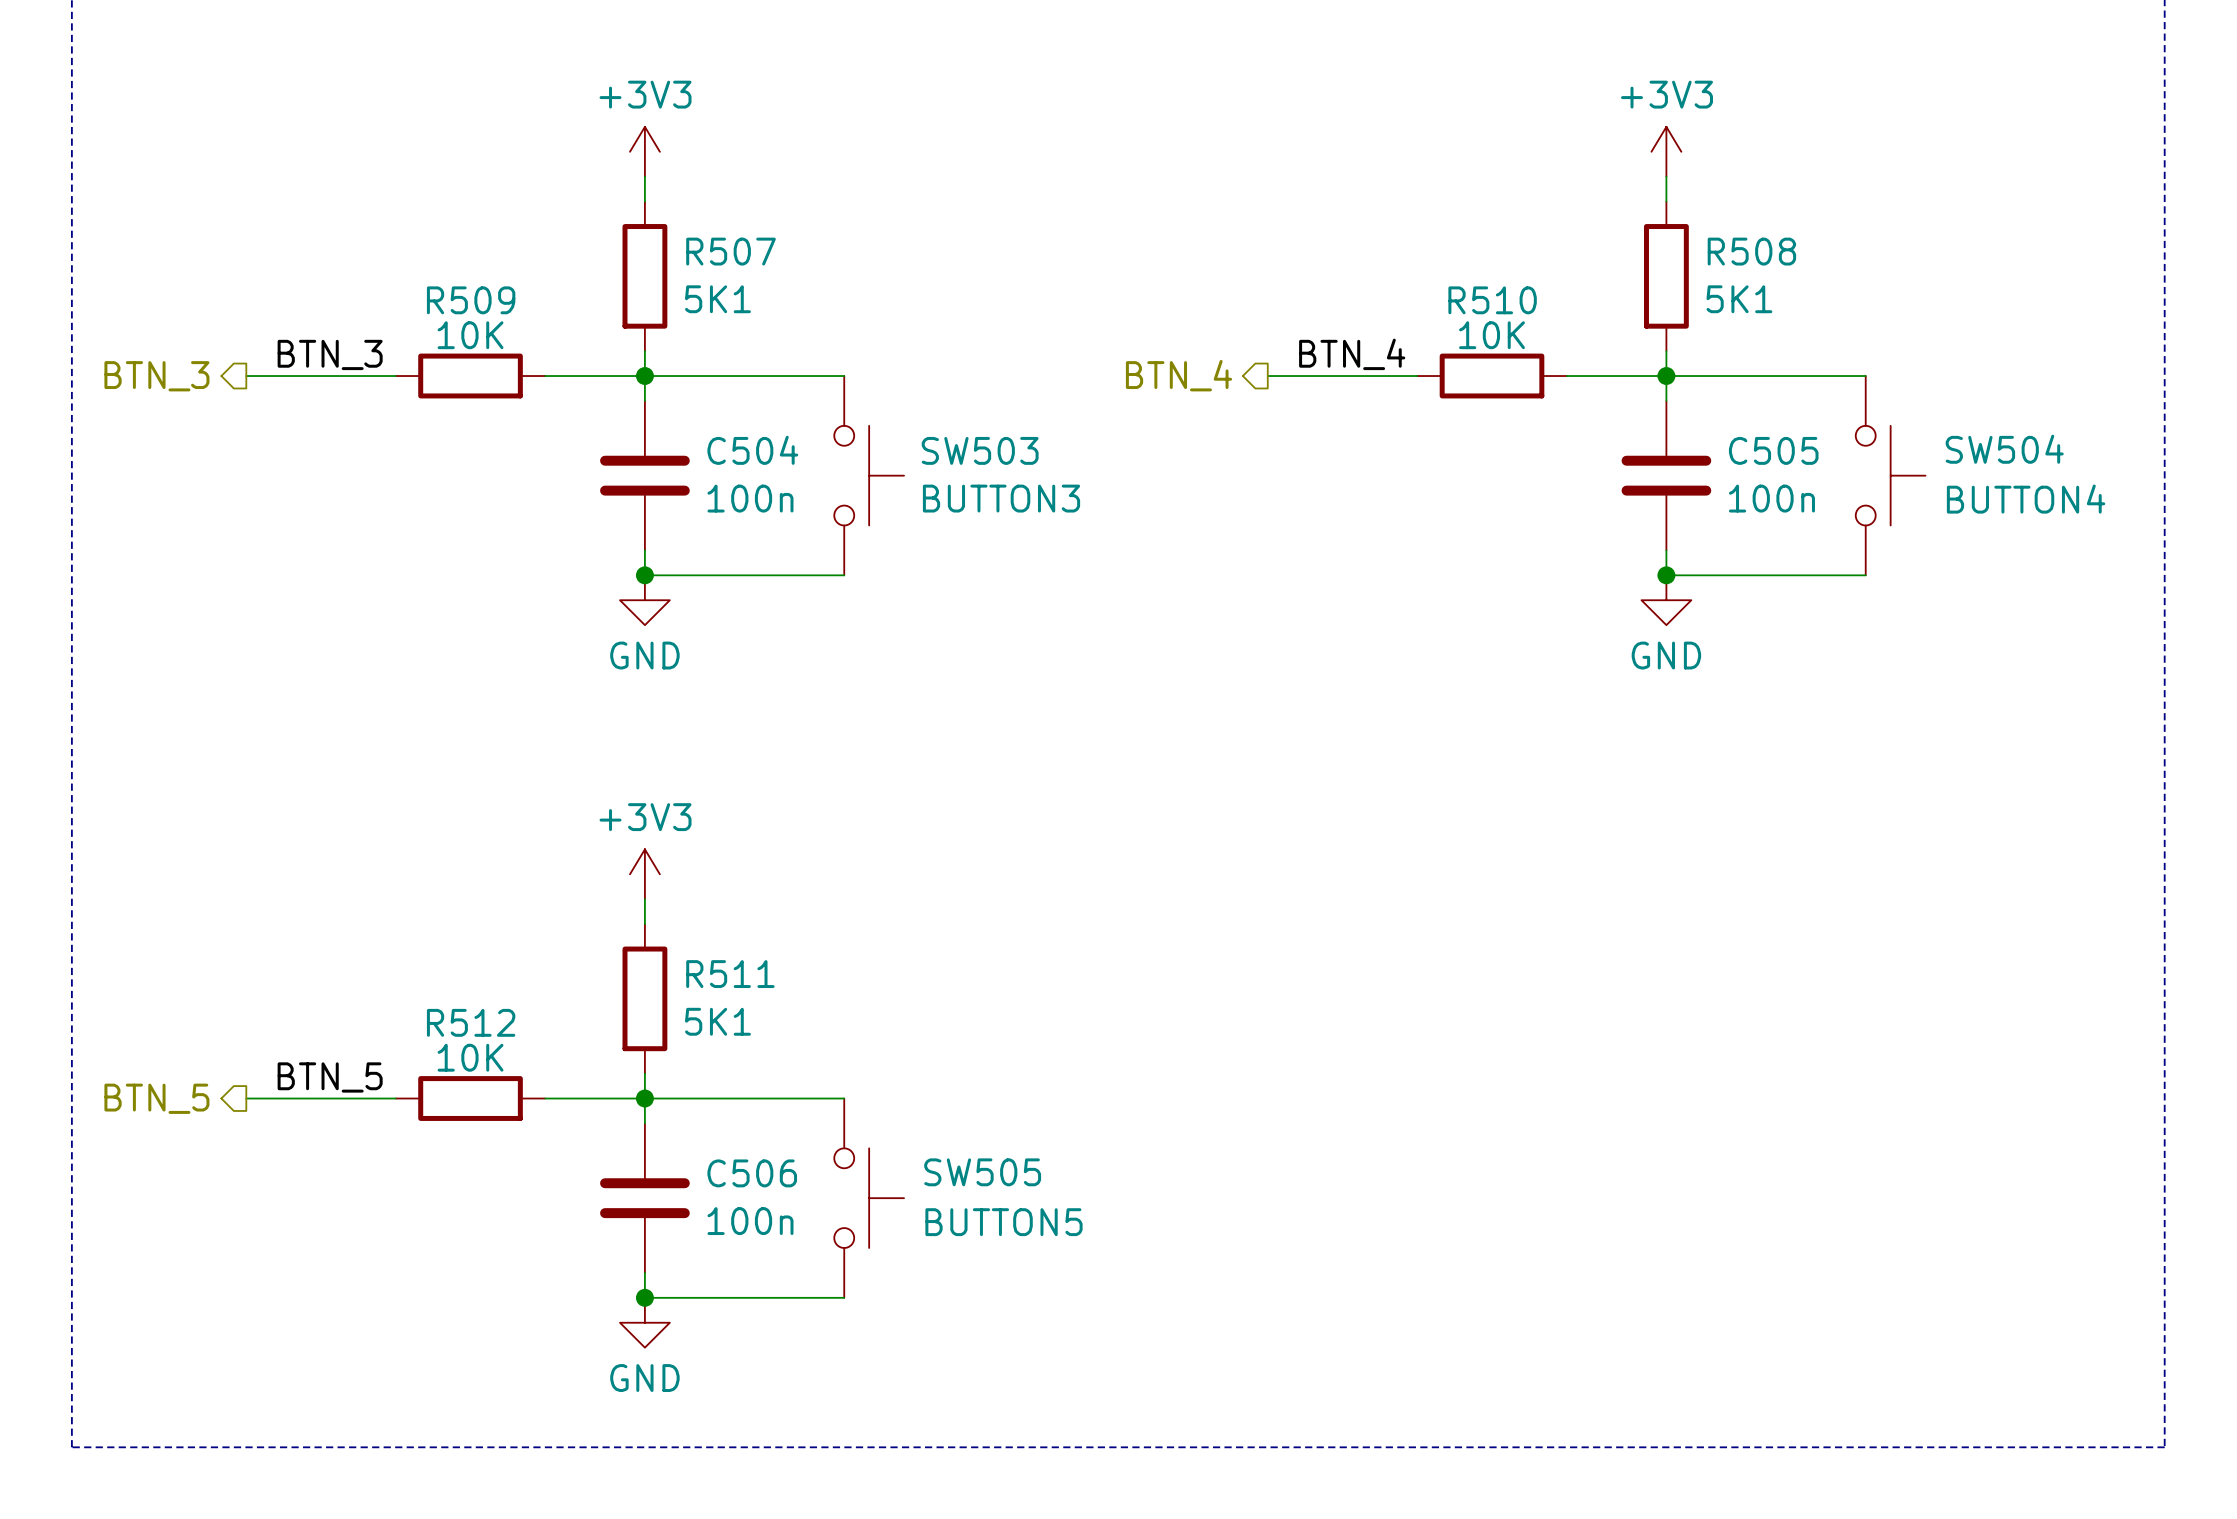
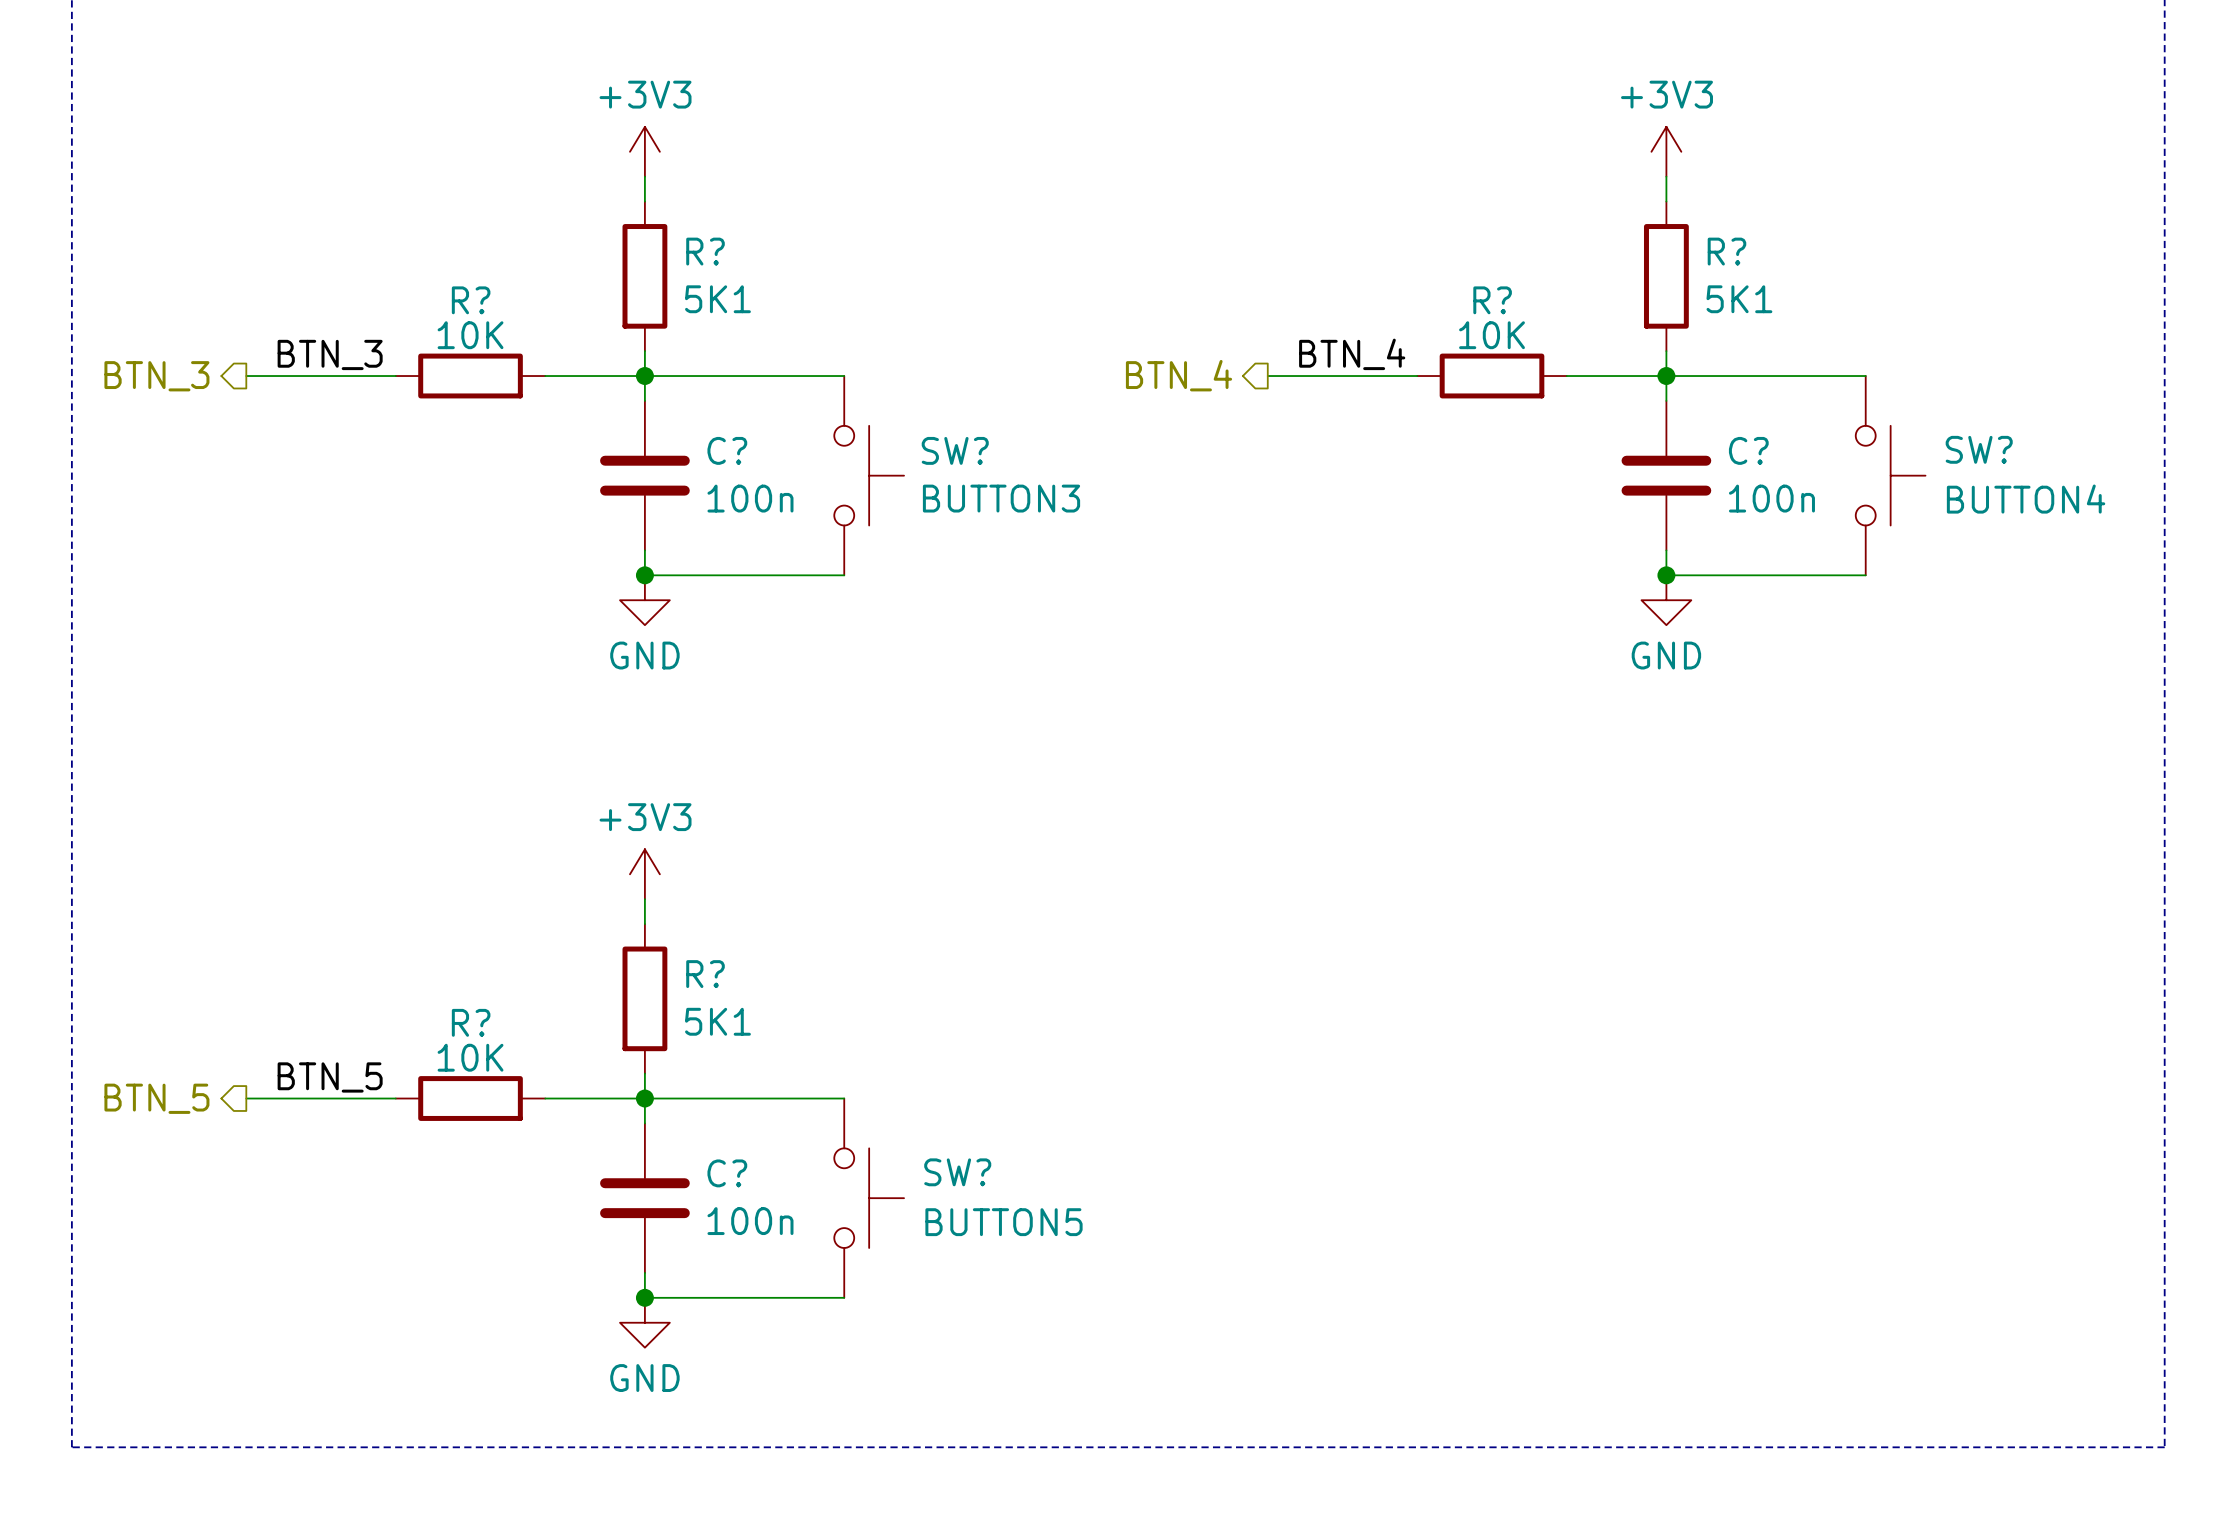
R507 name: R507 (731, 251) -> R? (705, 251)
R508 name: R508 (1751, 251) -> R? (1726, 251)
R509 name: R509 (471, 300) -> R? (471, 300)
R510 name: R510 (1492, 300) -> R? (1492, 300)
SW504 name: SW504 (2004, 449) -> SW? (1979, 449)
C504 name: C504 (752, 450) -> C? (727, 450)
SW503 name: SW503 (980, 450) -> SW? (955, 450)
C505 name: C505 (1773, 450) -> C? (1748, 450)
R511 name: R511 (730, 974) -> R? (705, 974)
R512 name: R512 (471, 1022) -> R? (471, 1022)
SW505 name: SW505 (982, 1172) -> SW? (957, 1172)
C506 name: C506 (752, 1173) -> C? (727, 1173)

